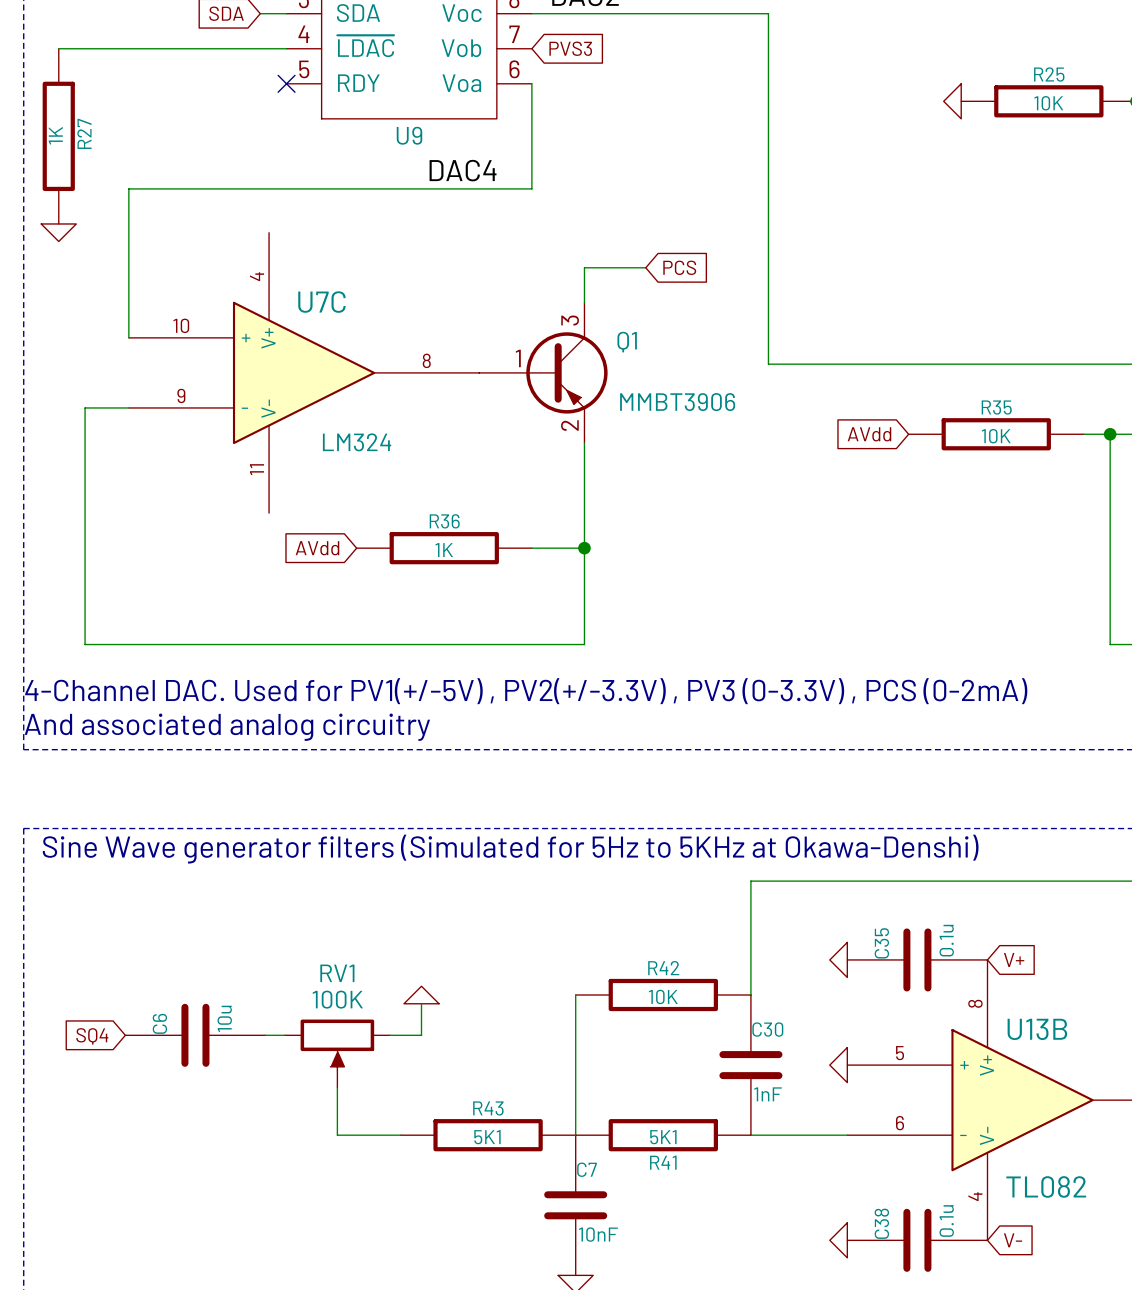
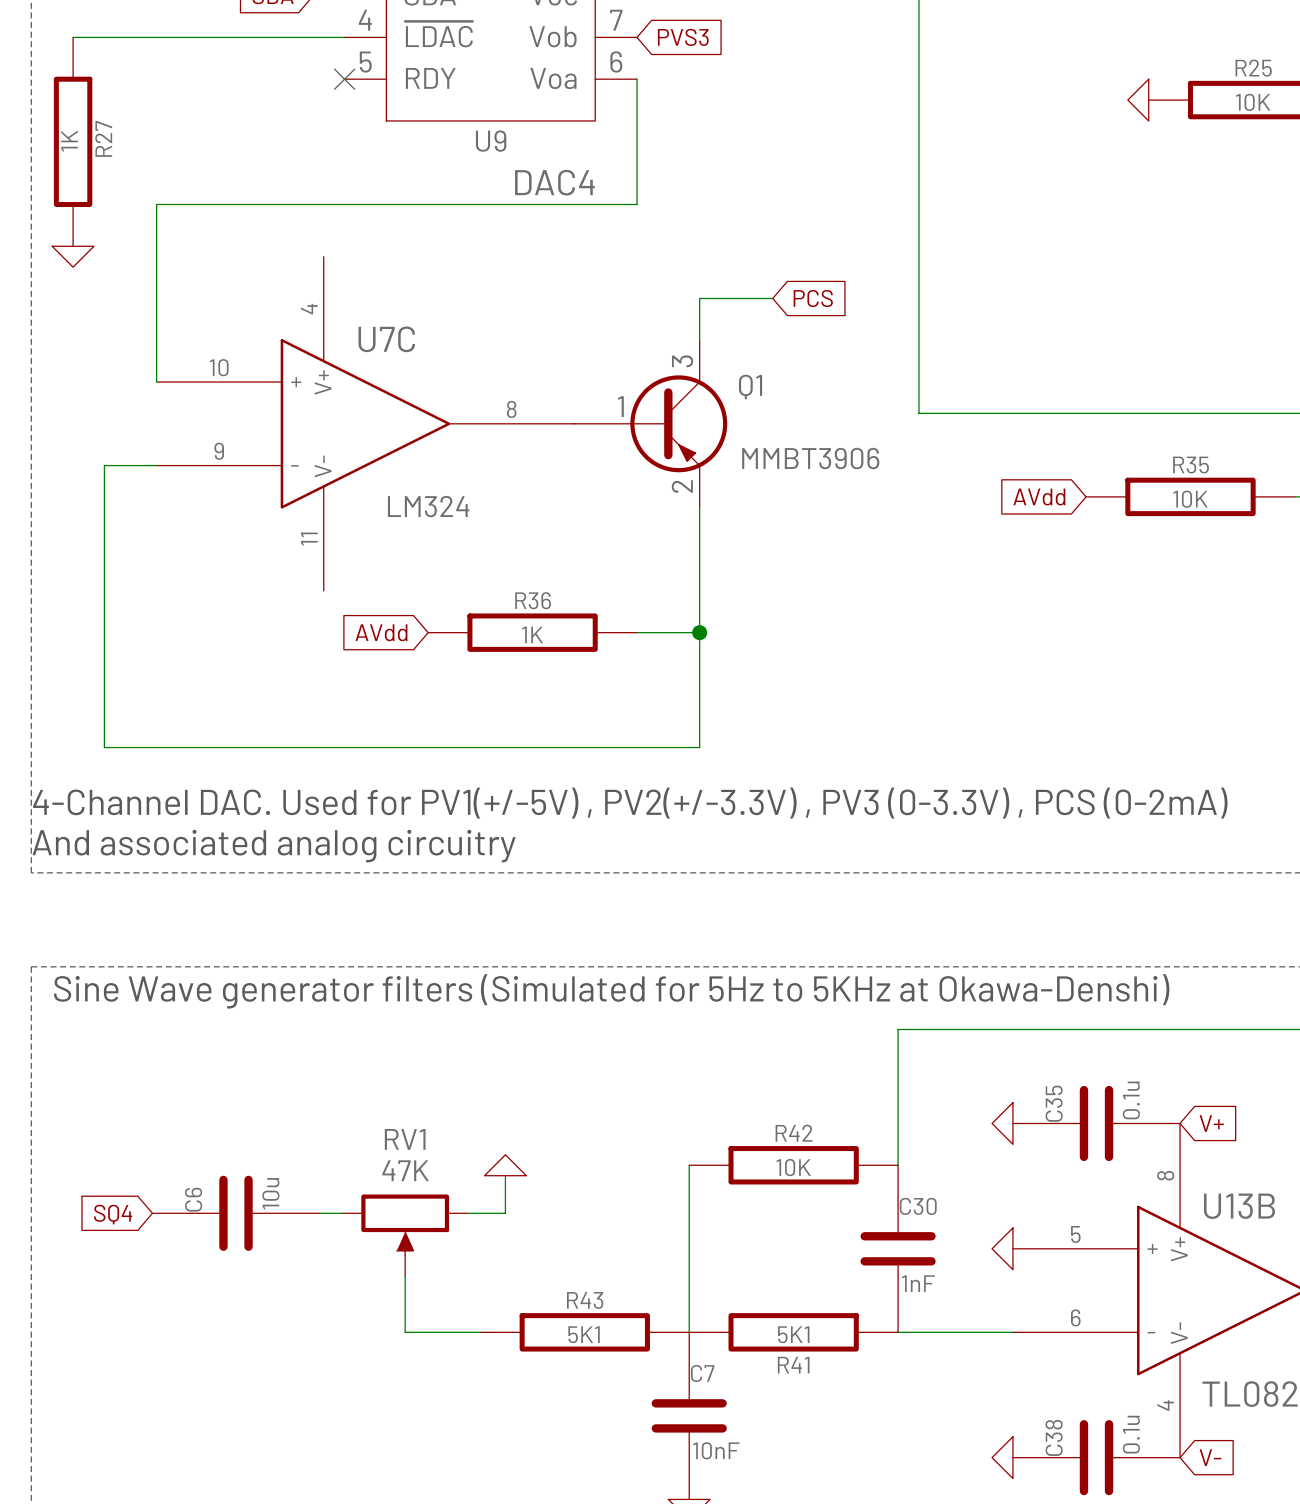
RV1 value: 100K (337, 999) -> 47K (405, 1170)

